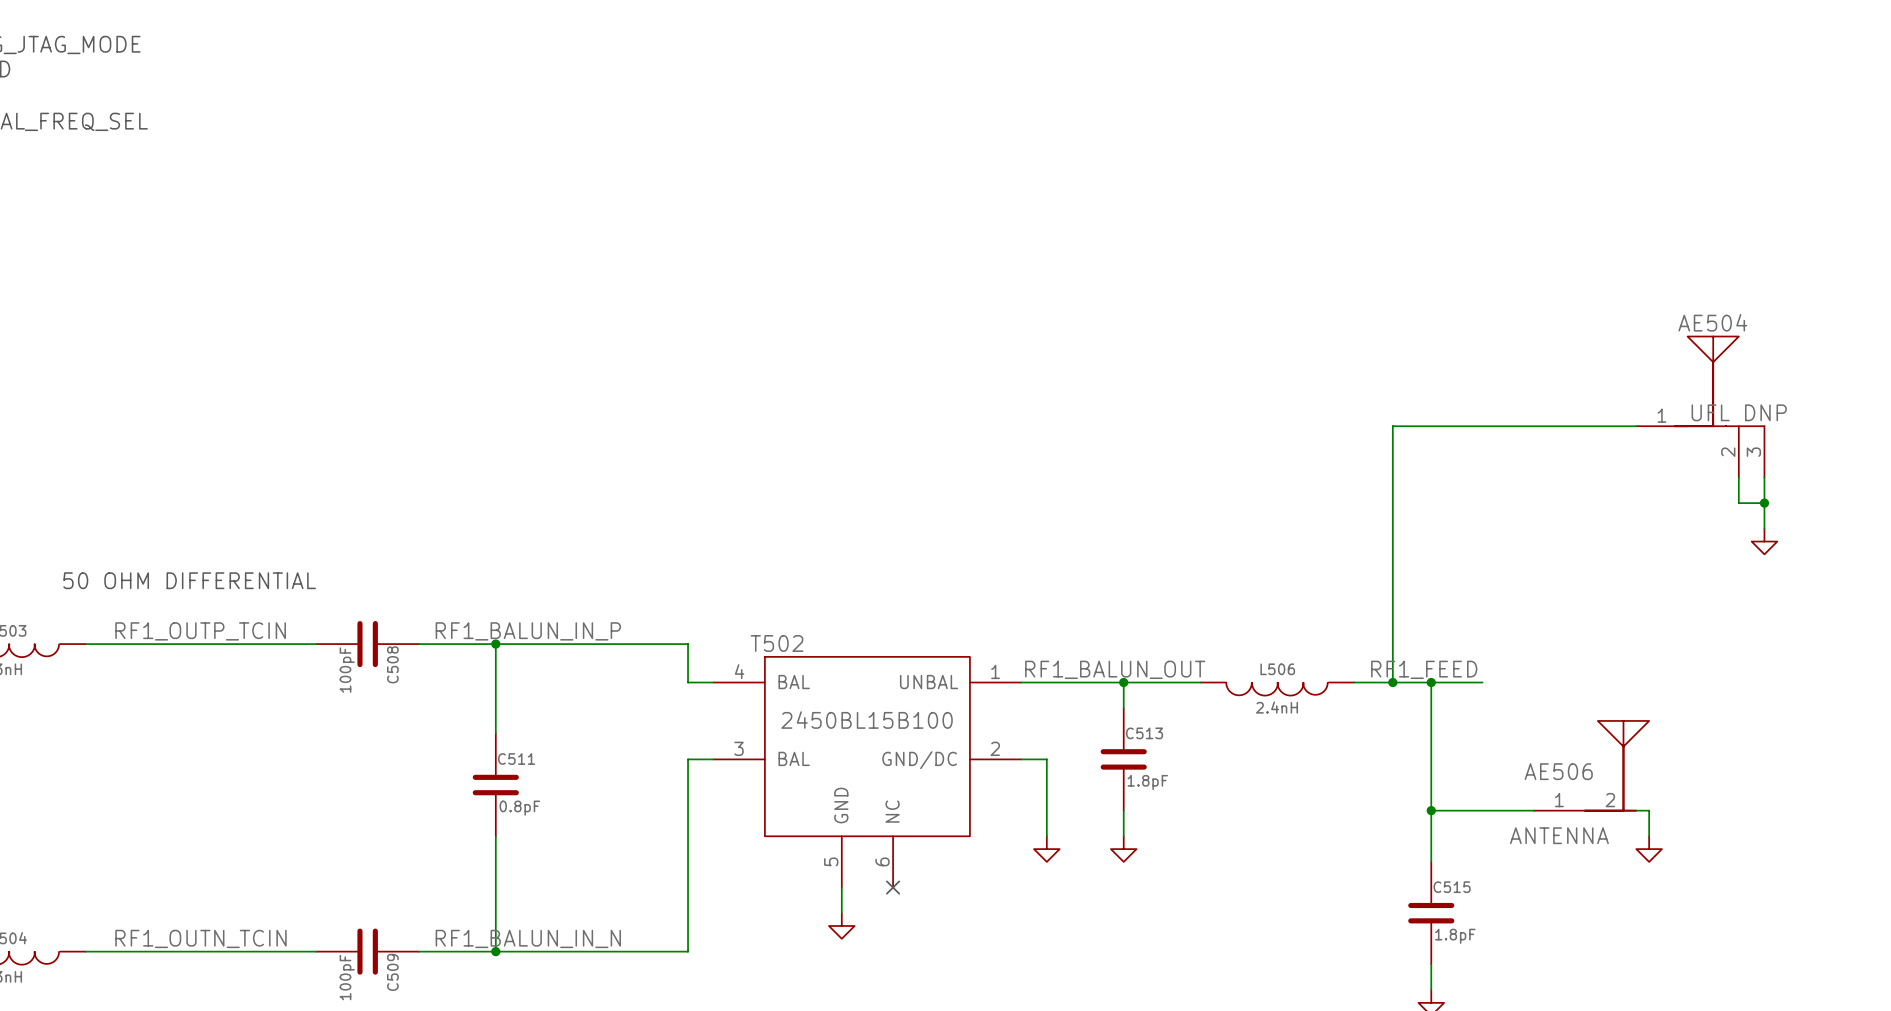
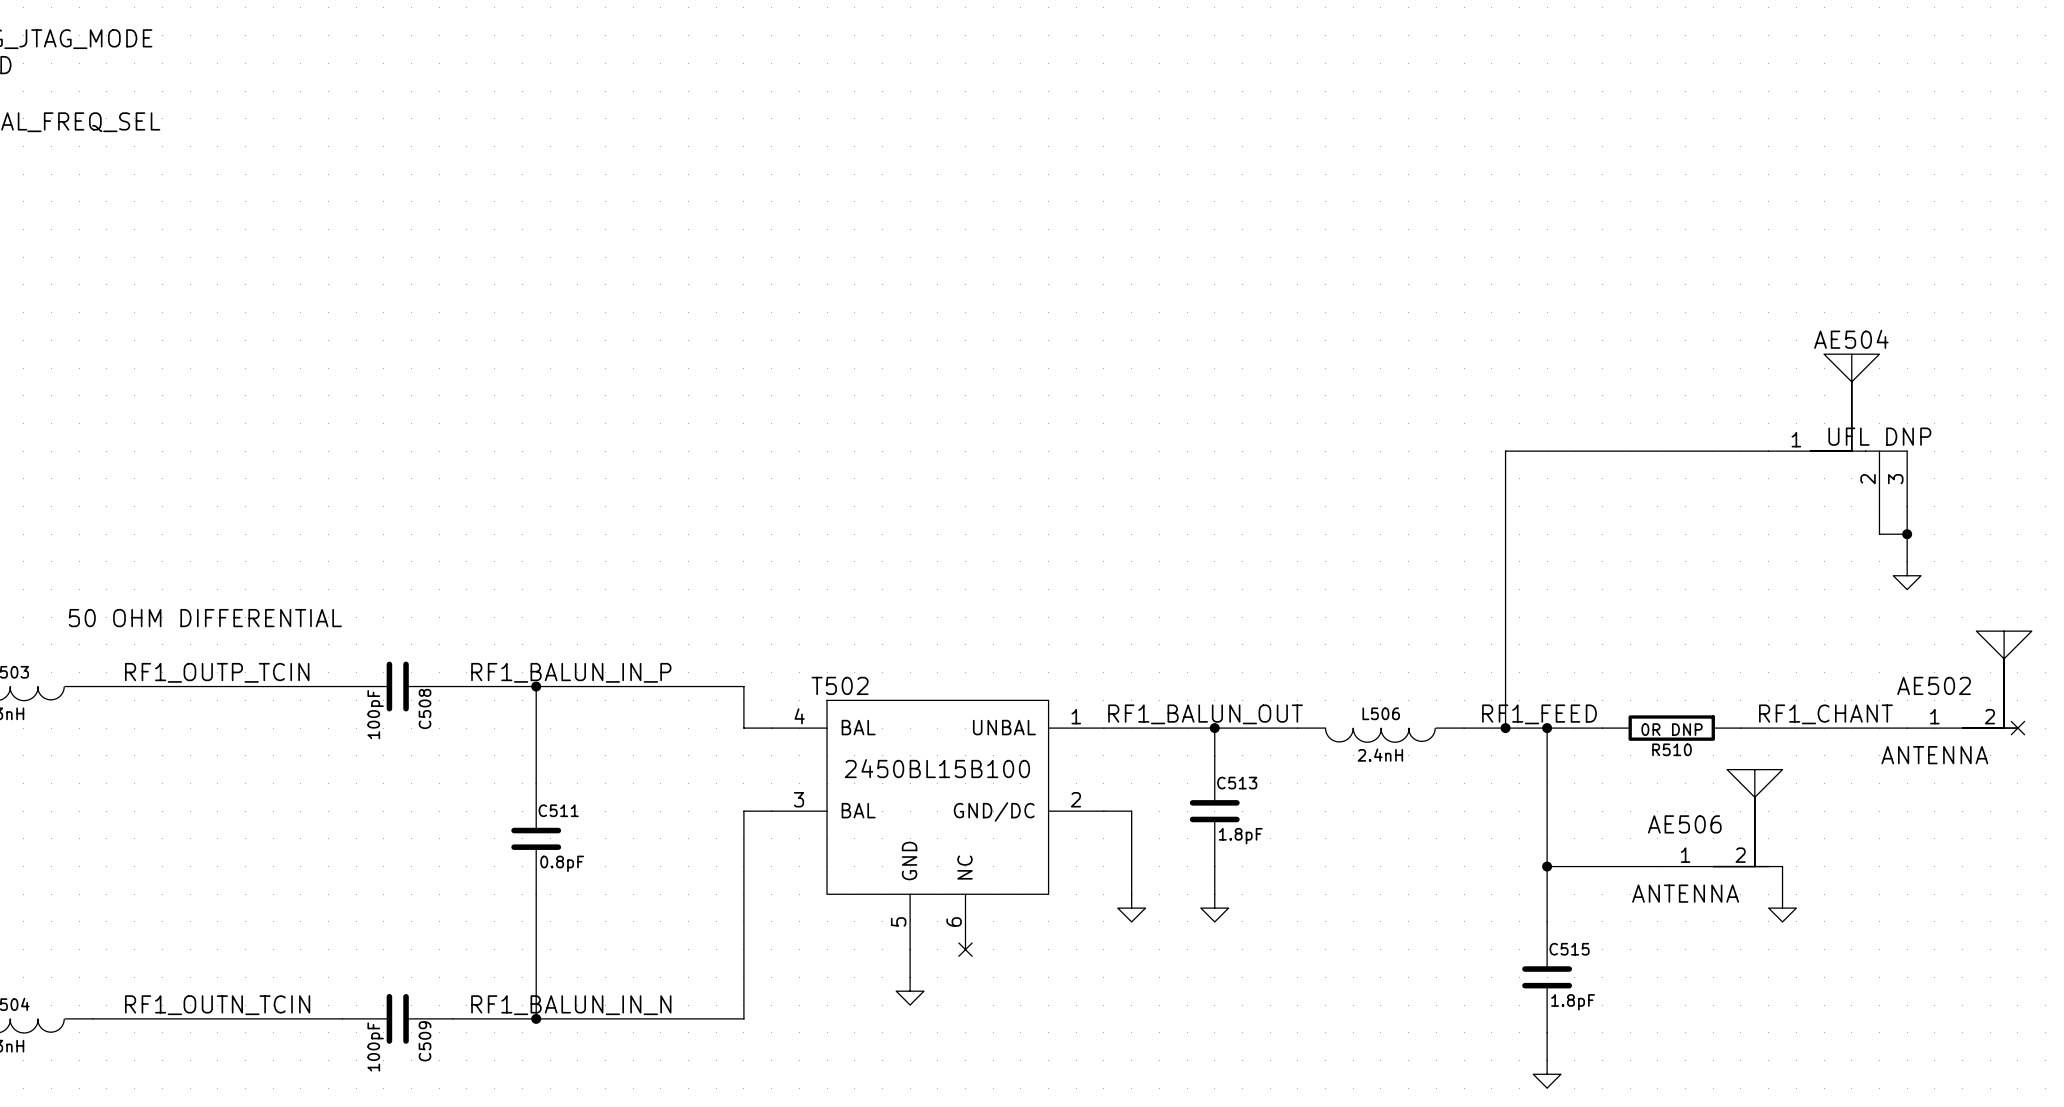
AE502: none -> ANTENNA (1969, 679)
label: none -> RF1_CHANT (1825, 714)
R510: none -> 0R DNP (1671, 728)
wire: none -> (1740, 728) (1907, 728)
no-connect mark: none -> (2017, 728)

